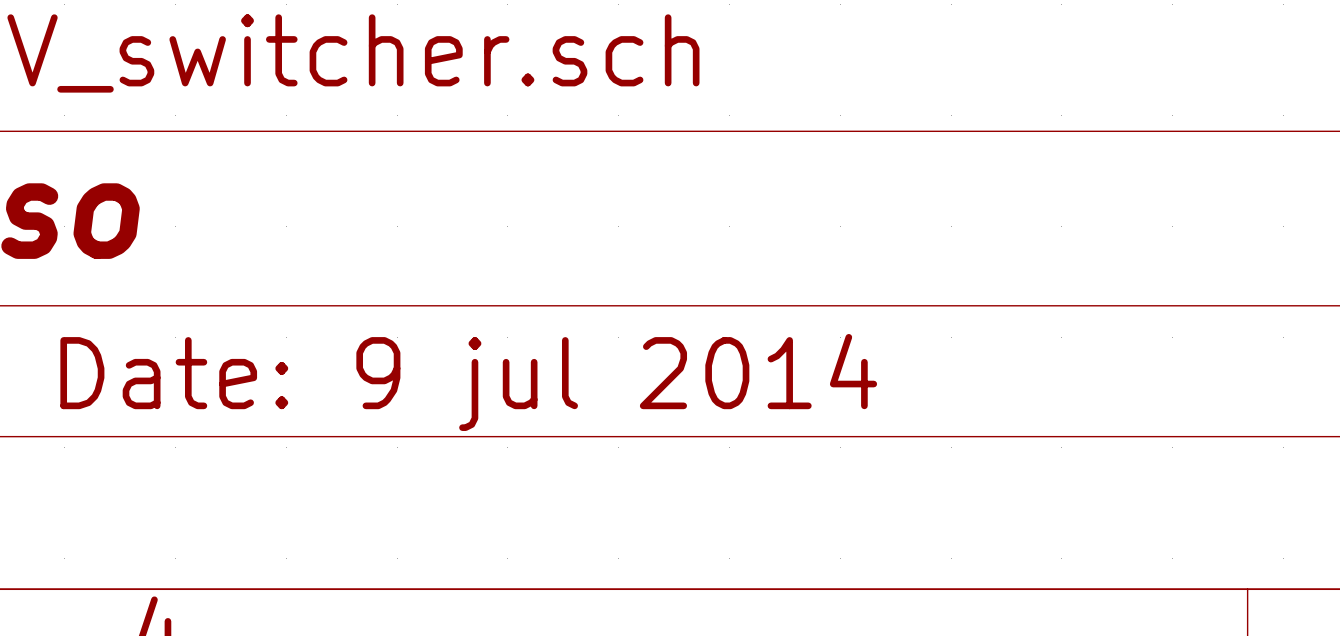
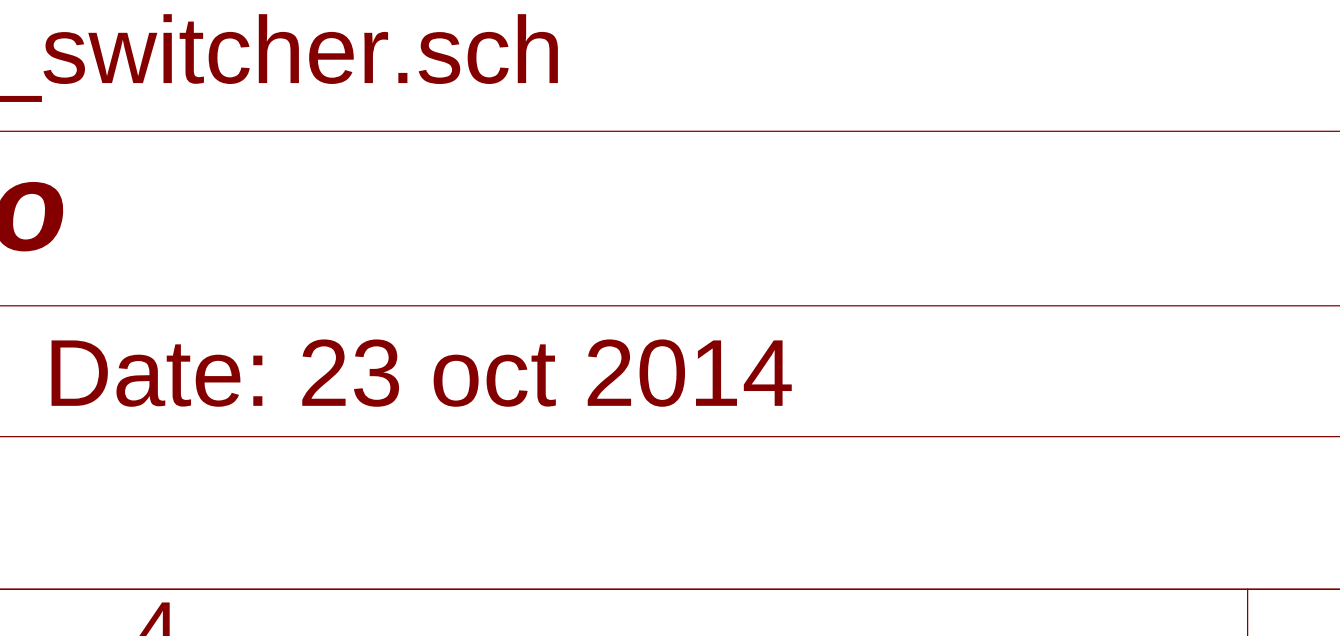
title block: Date: 9 jul 2014 (468, 382) -> Date: 23 oct 2014 (421, 373)

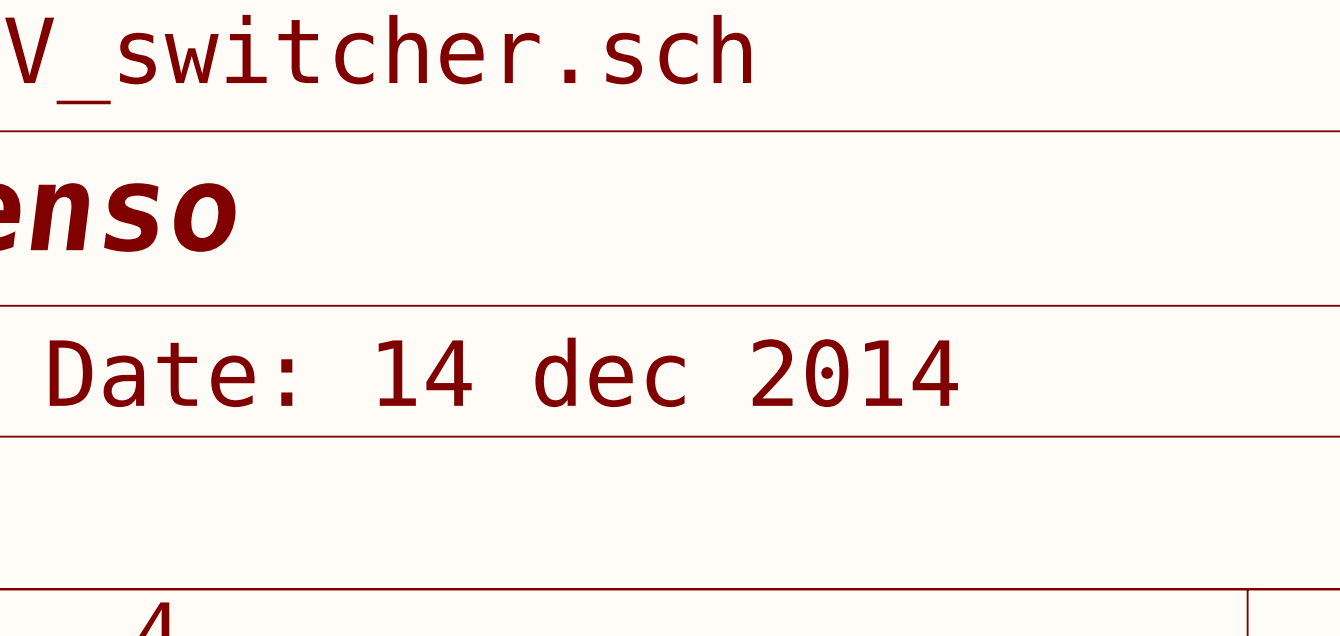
title block: Date: 23 oct 2014 (421, 373) -> Date: 14 dec 2014 (503, 372)

